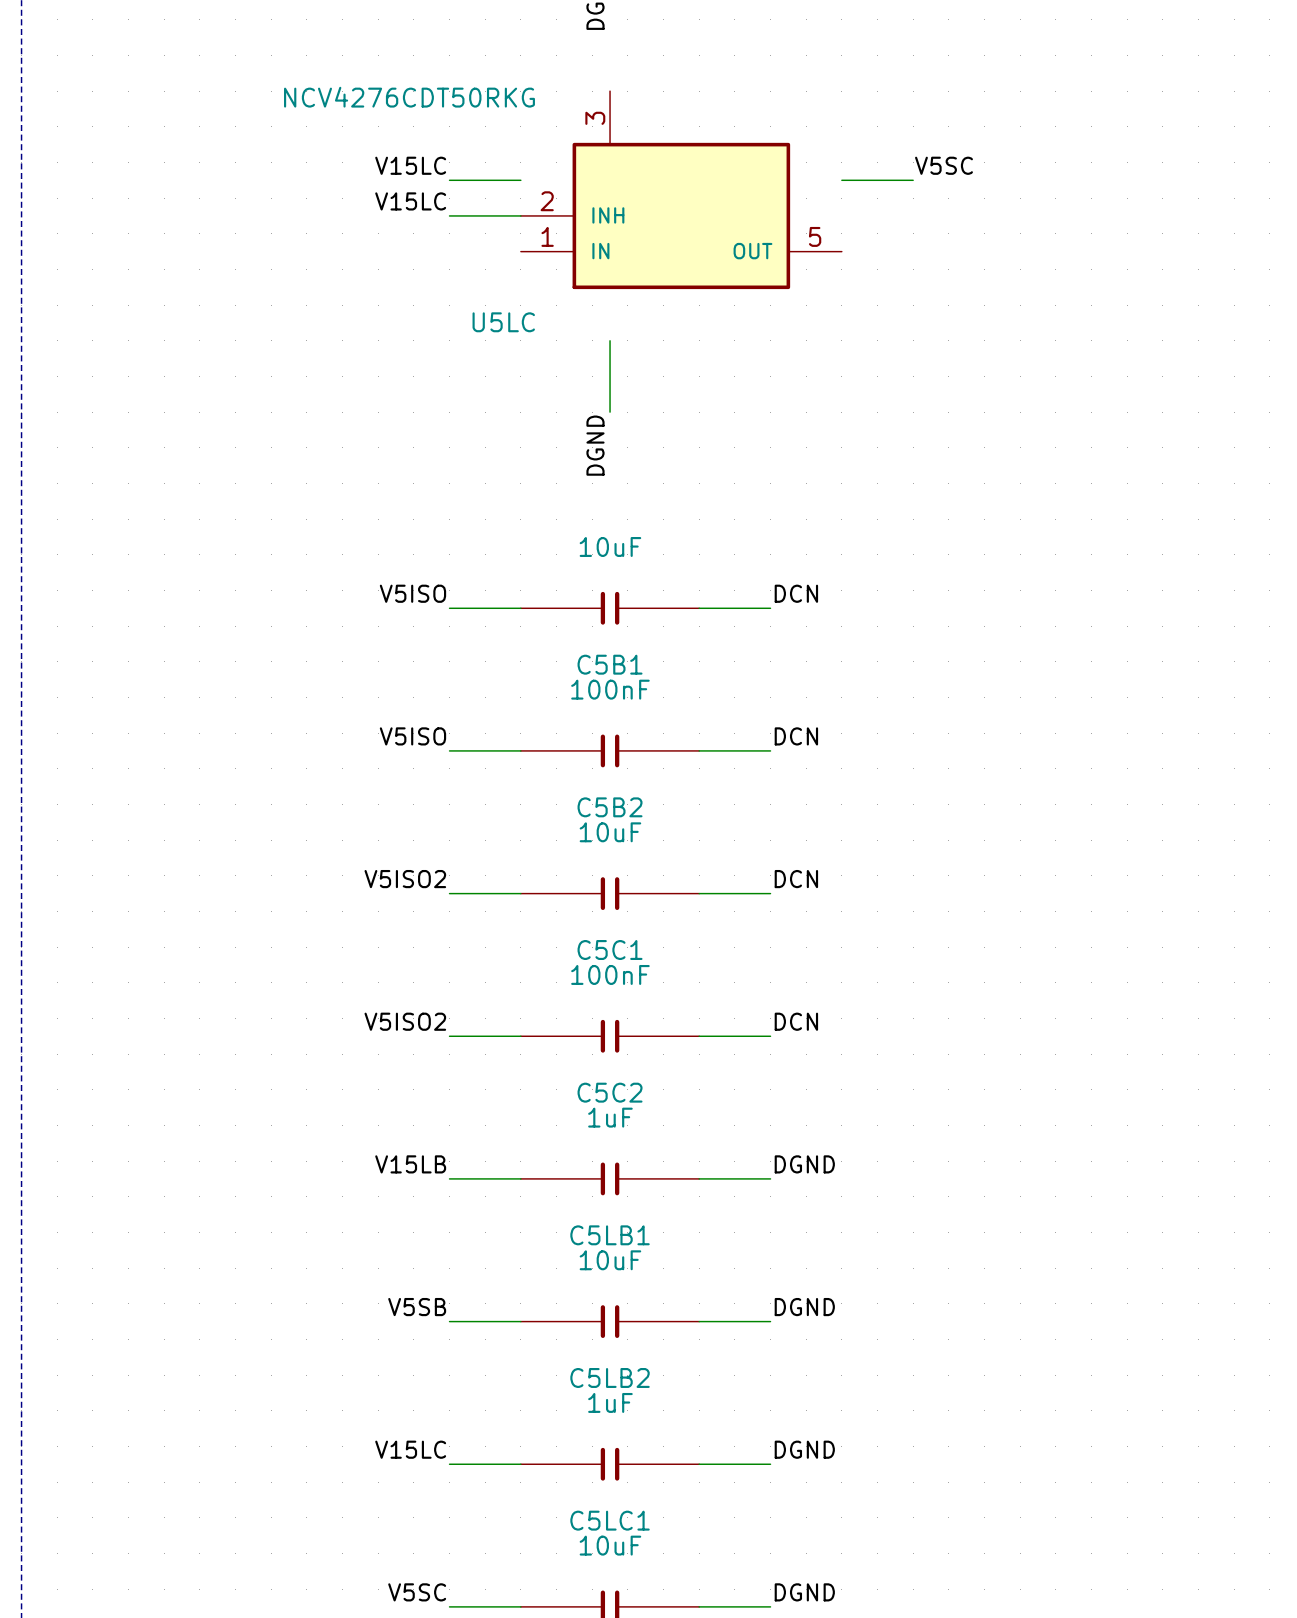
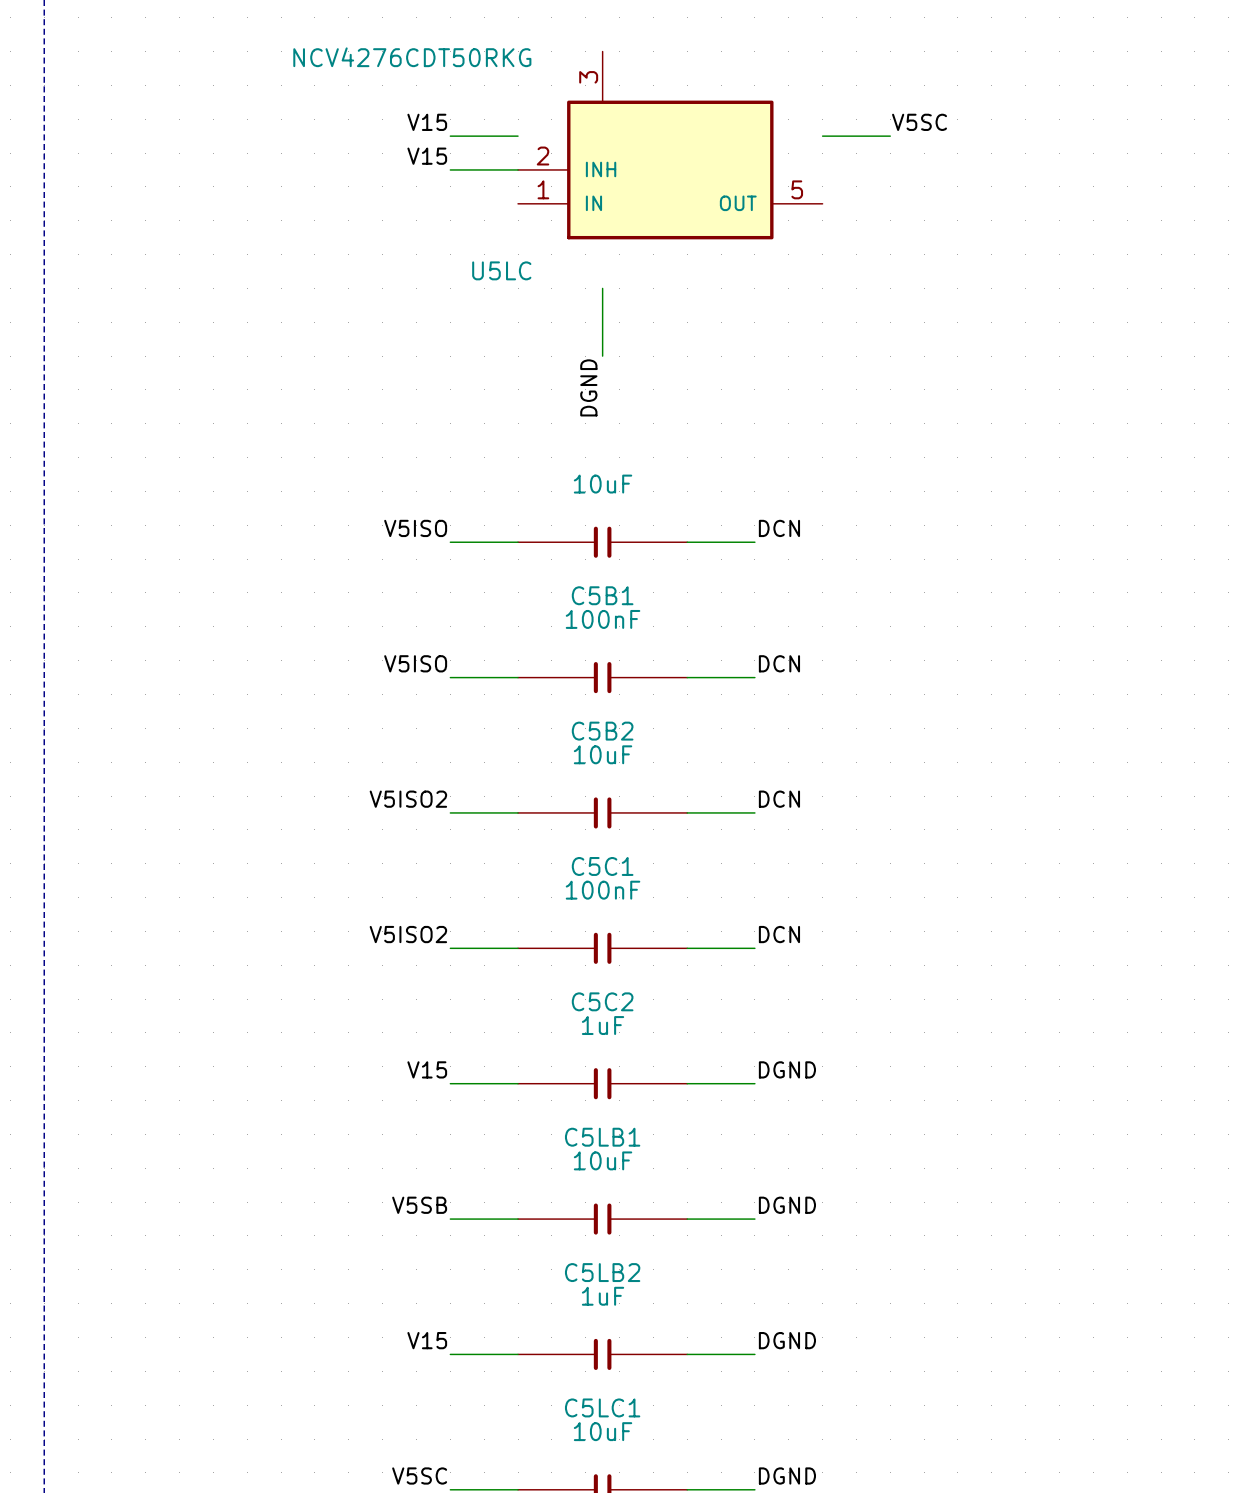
label: V15LC (410, 165) -> V15 (427, 122)
label: V15LC (410, 201) -> V15 (427, 156)
label: V15LB (410, 1164) -> V15 (427, 1069)
label: V15LC (410, 1449) -> V15 (427, 1340)

